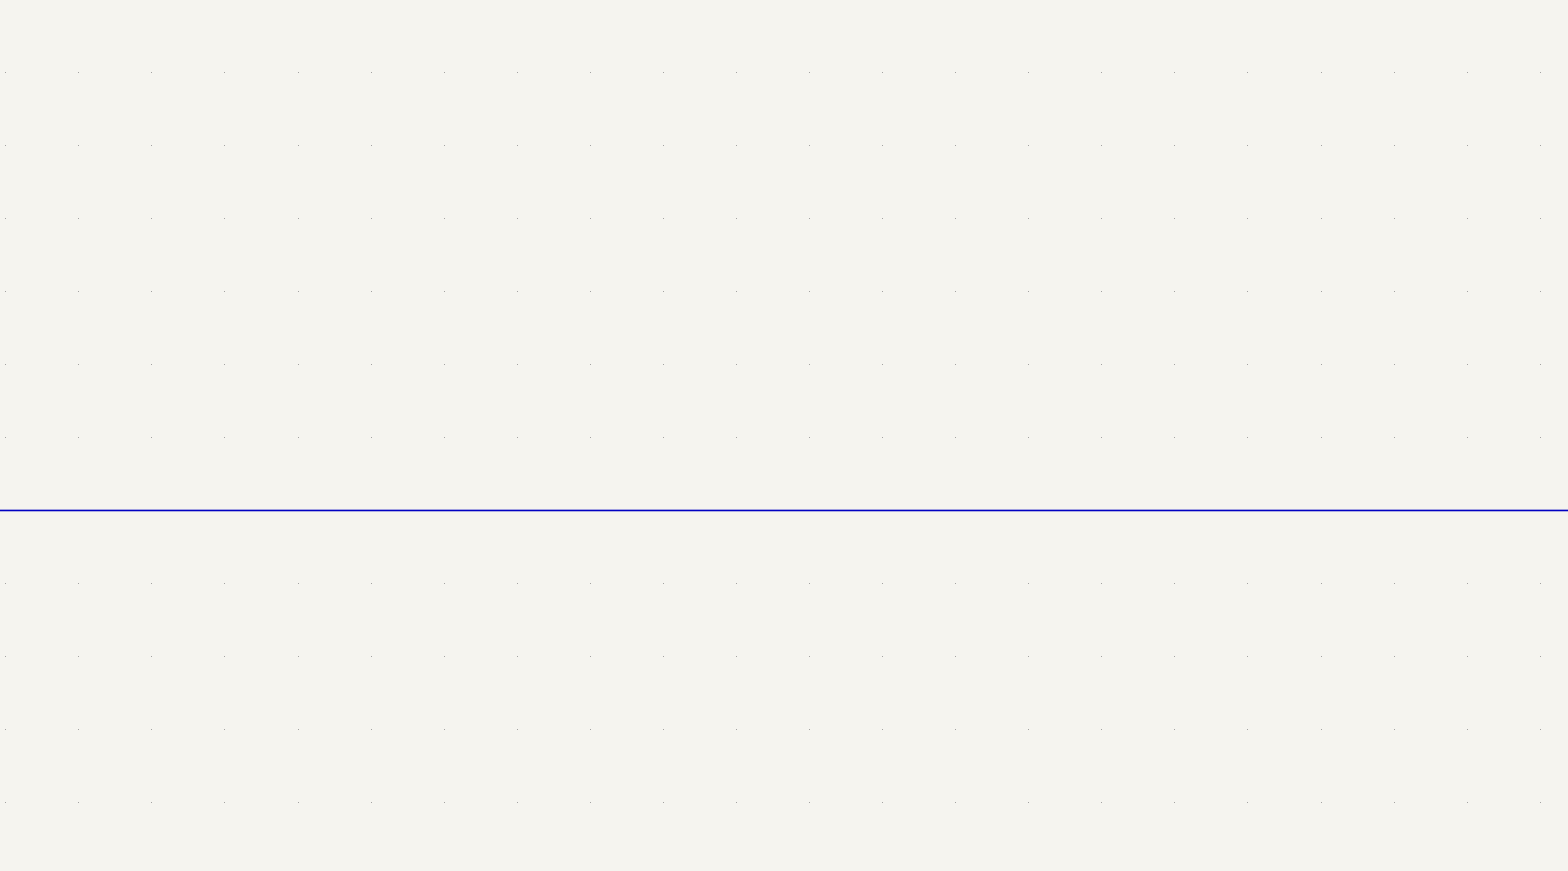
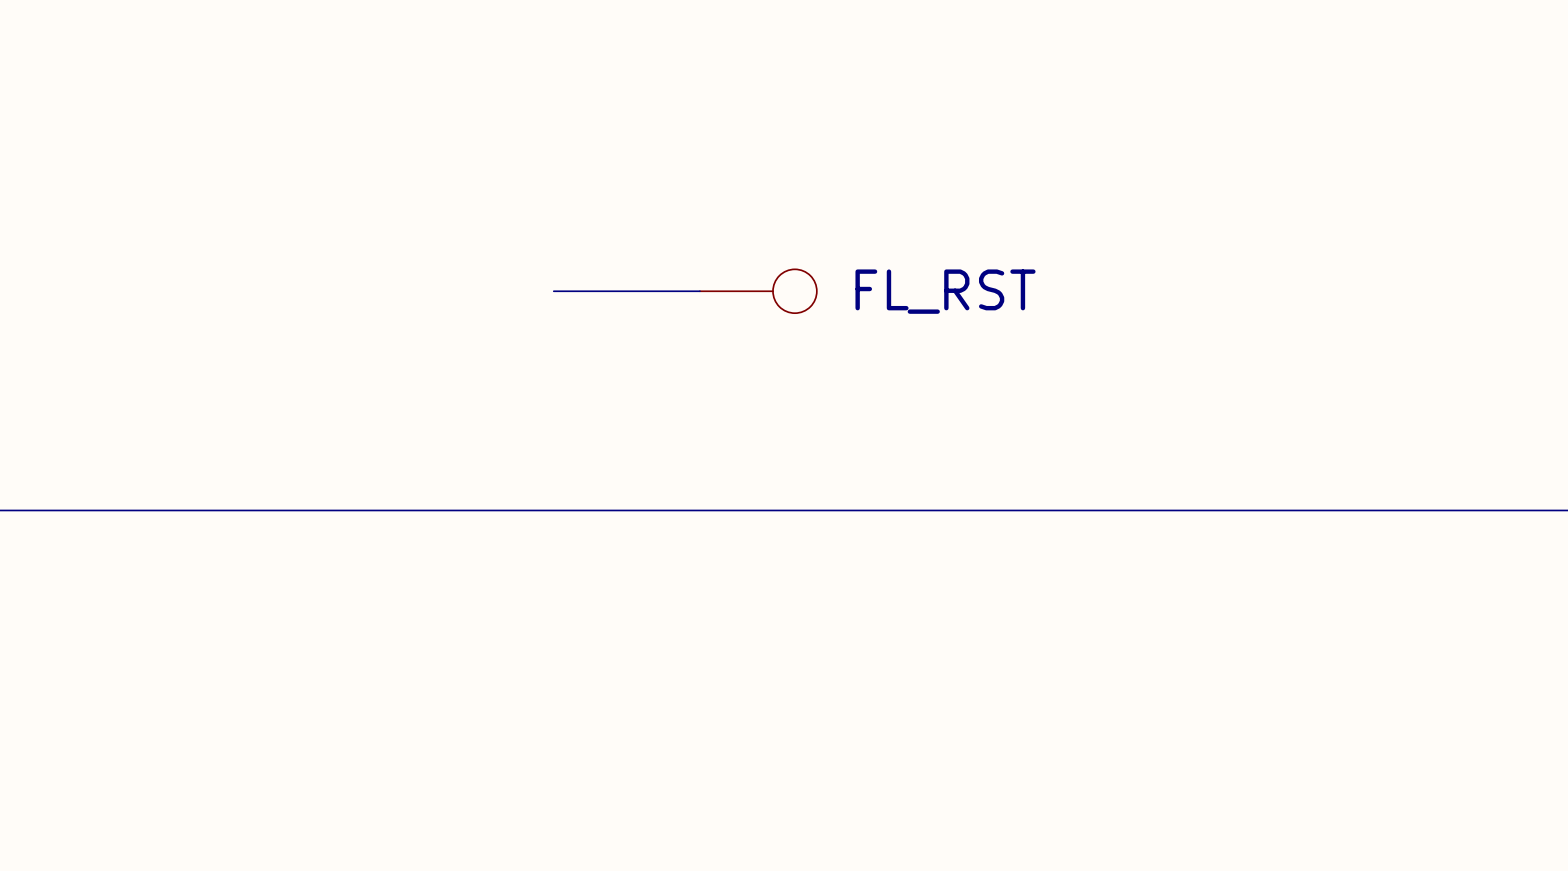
wire: none -> (553, 291) (699, 291)
part: none -> FL_RST (758, 291)

